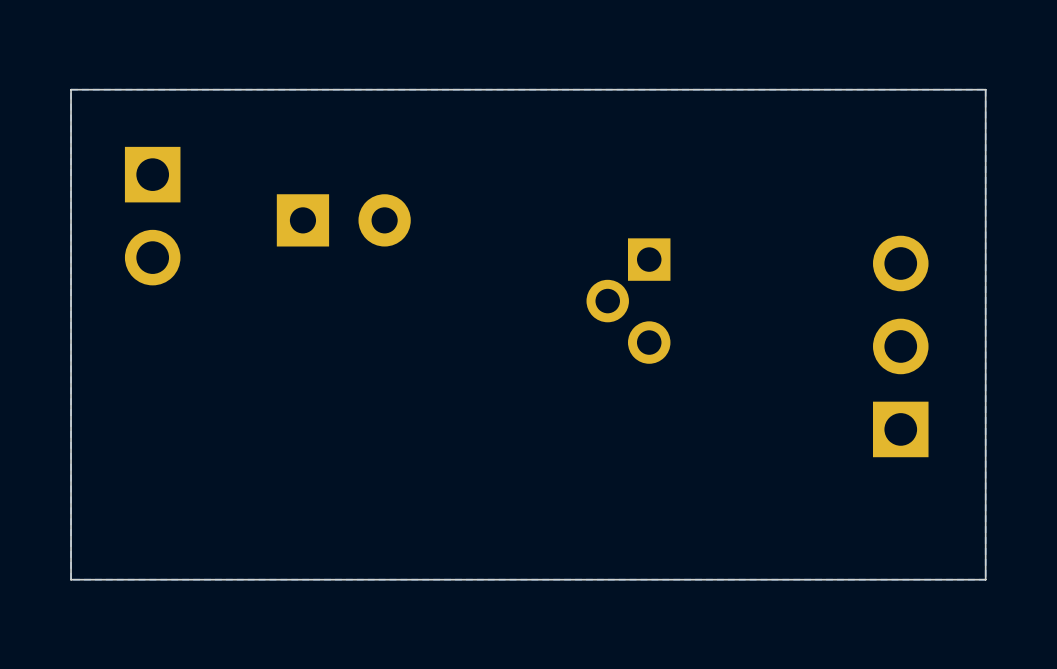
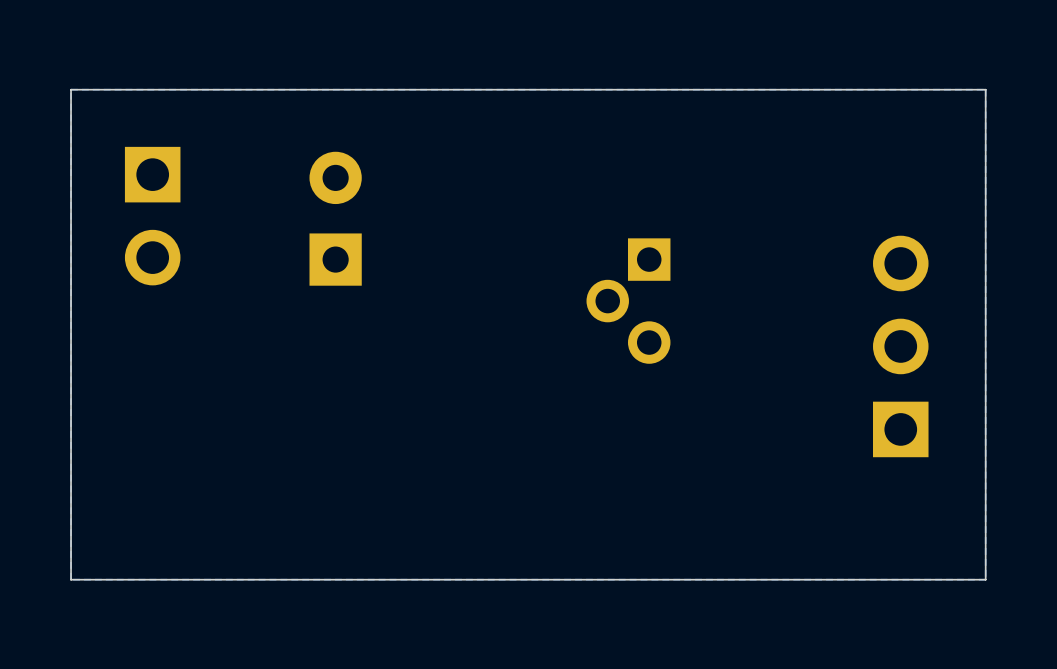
part rotation: 0° (343, 220) -> 90° counterclockwise (335, 218)

